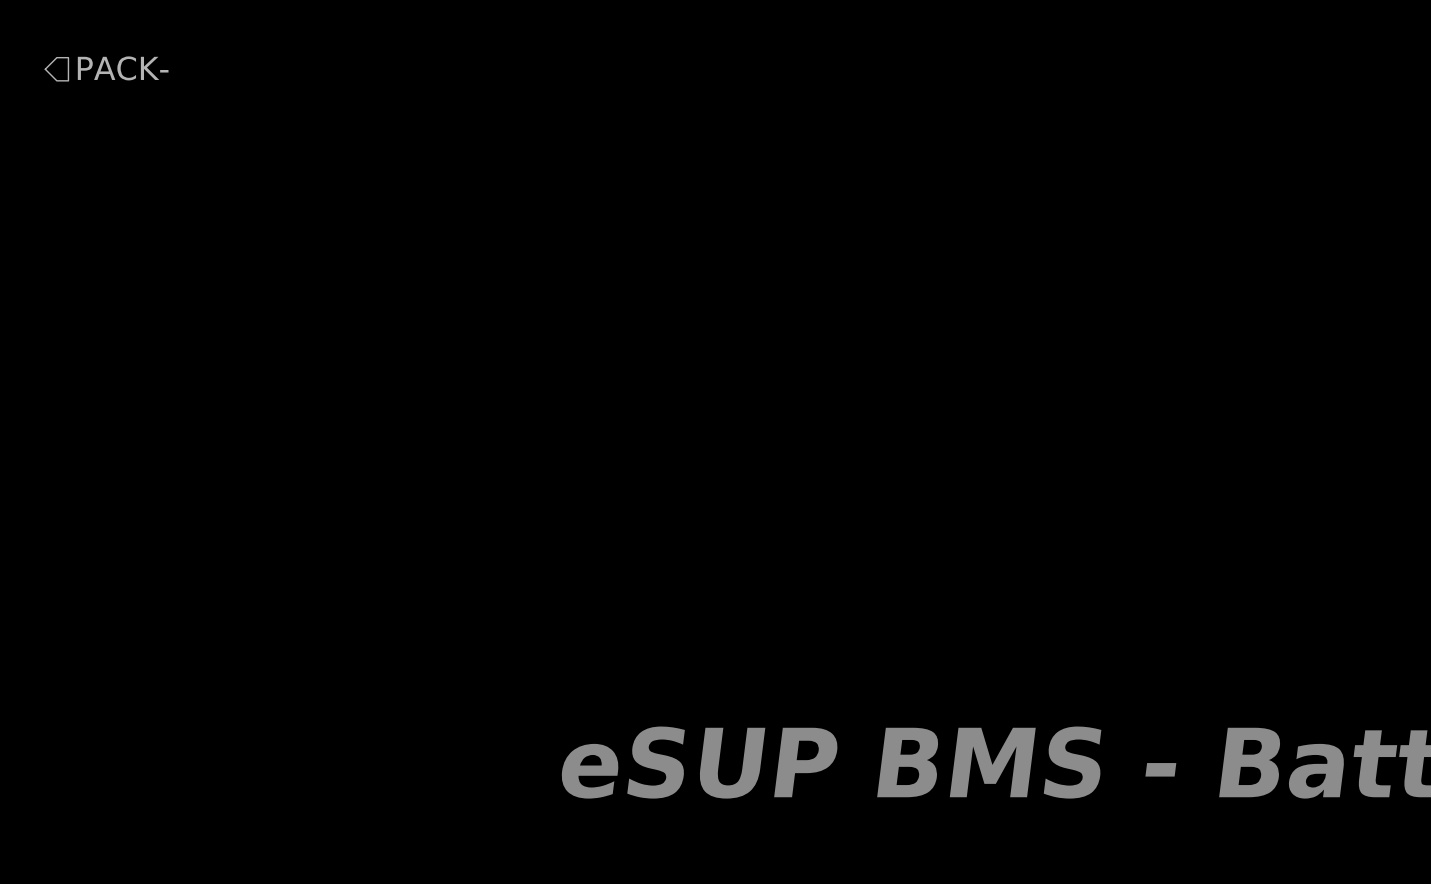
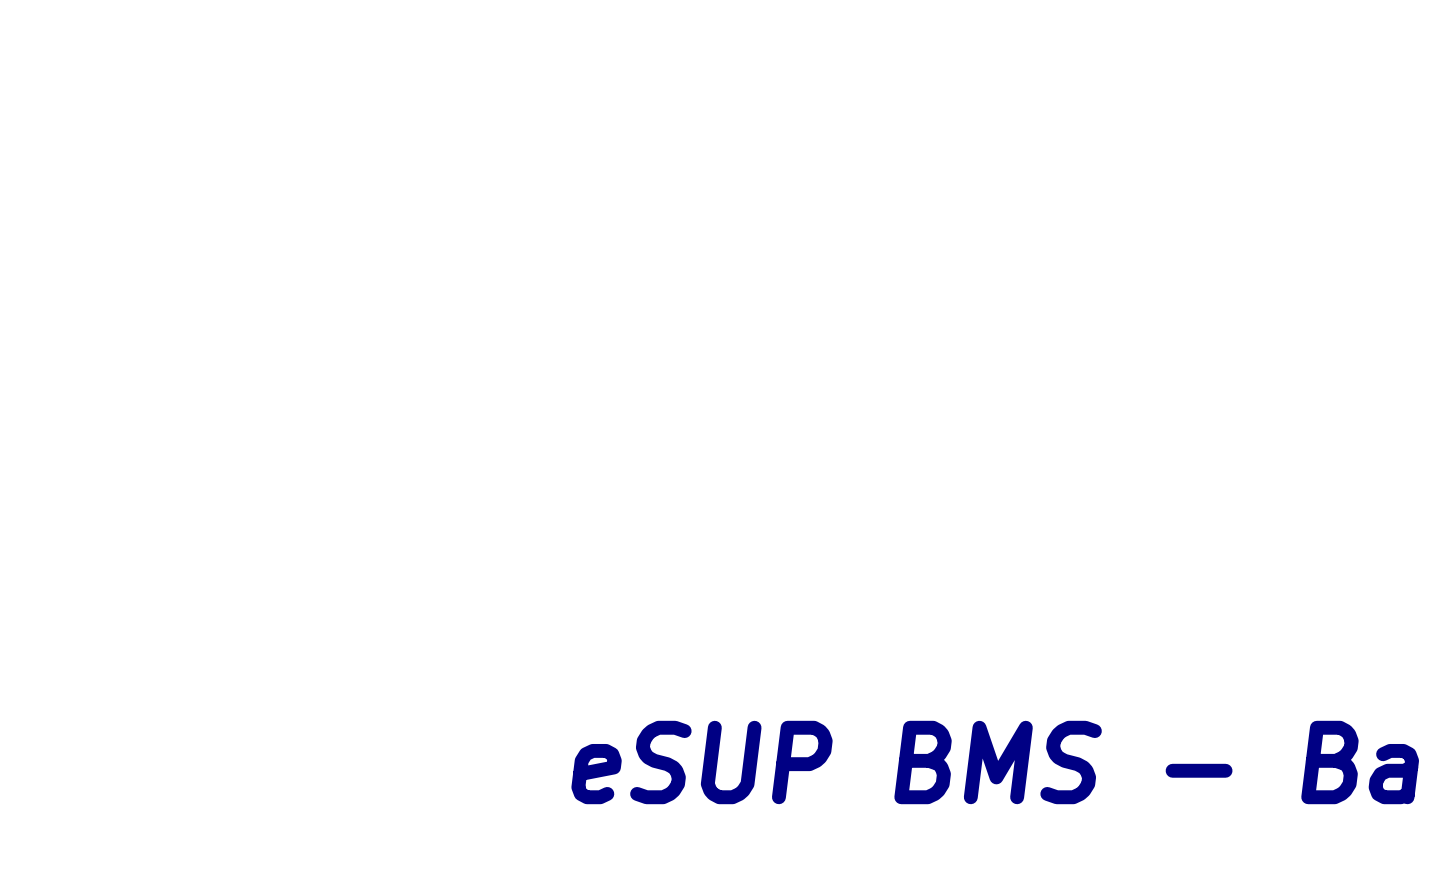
hierarchical label: PACK- (123, 68) -> none

